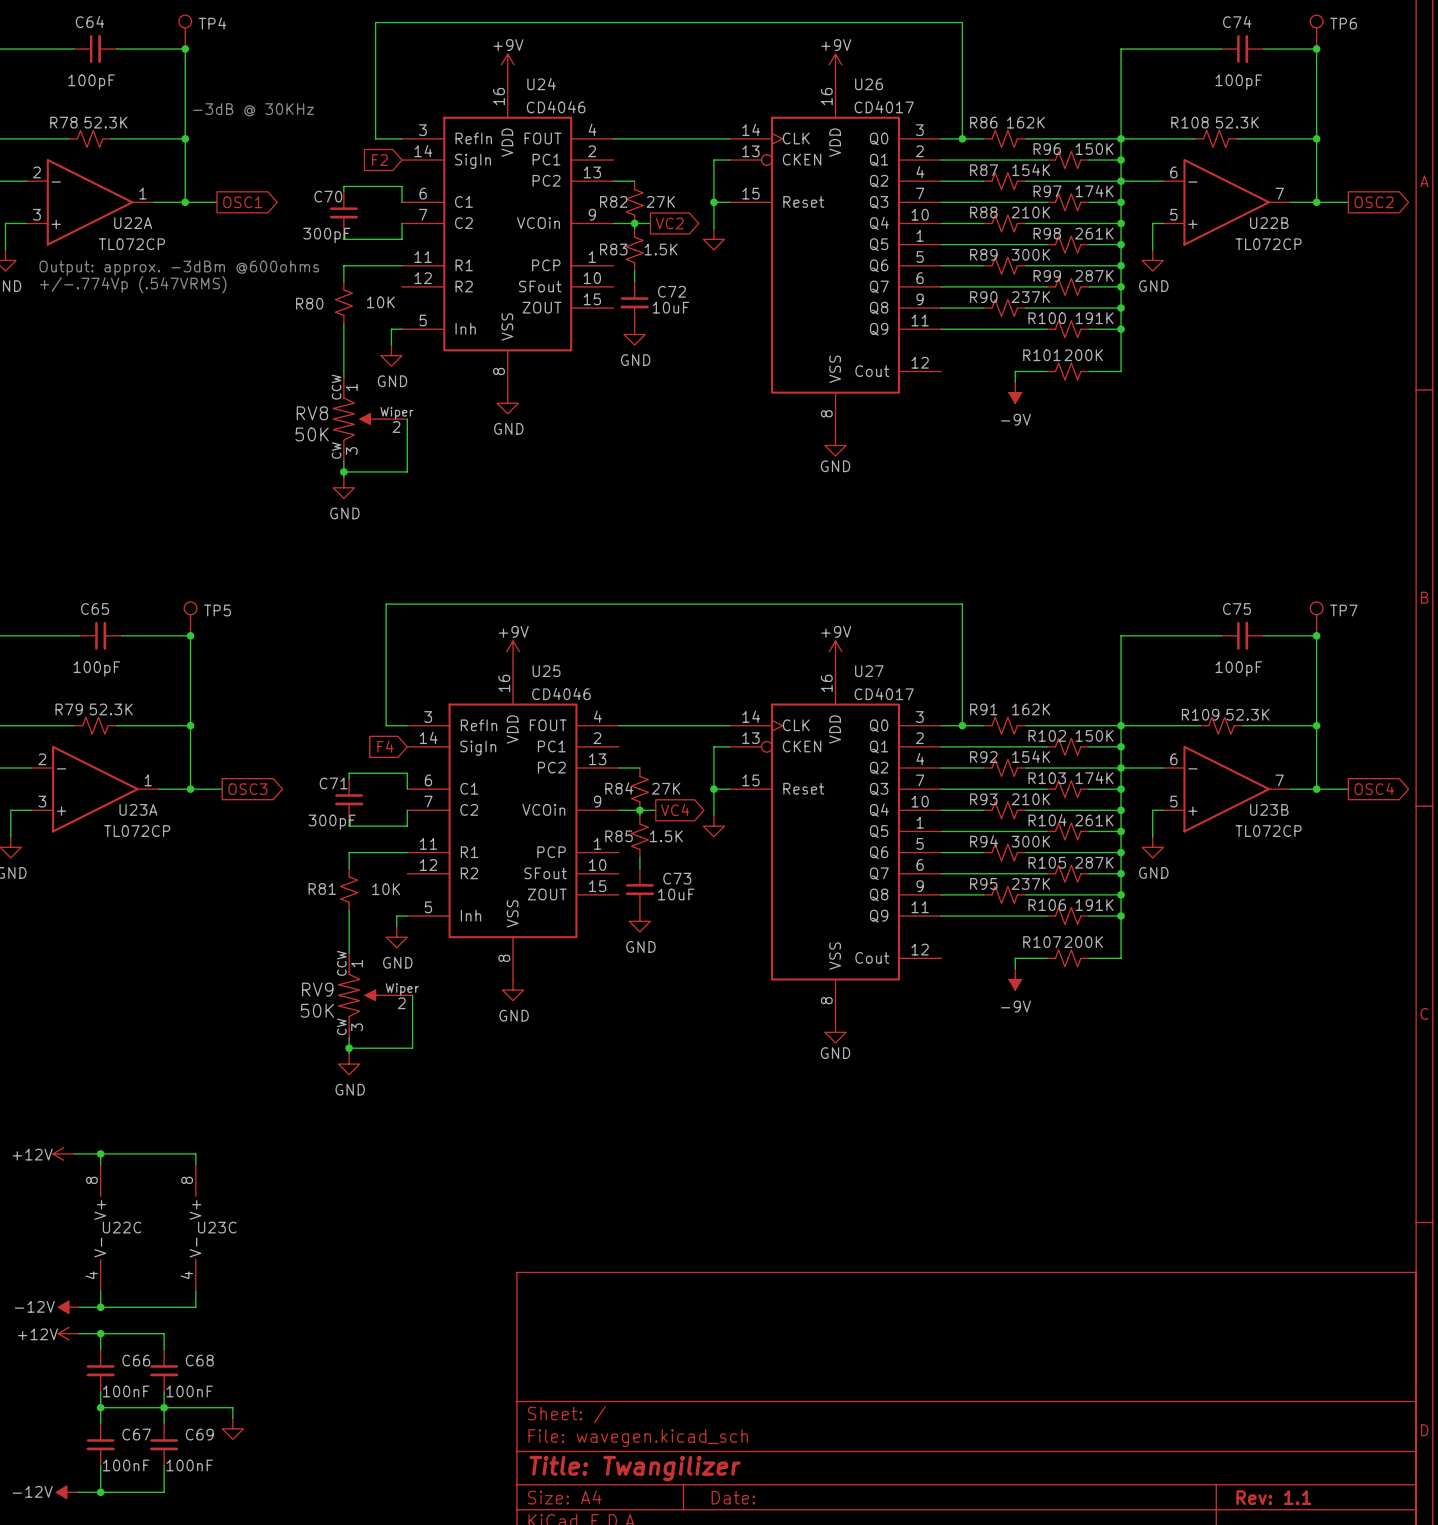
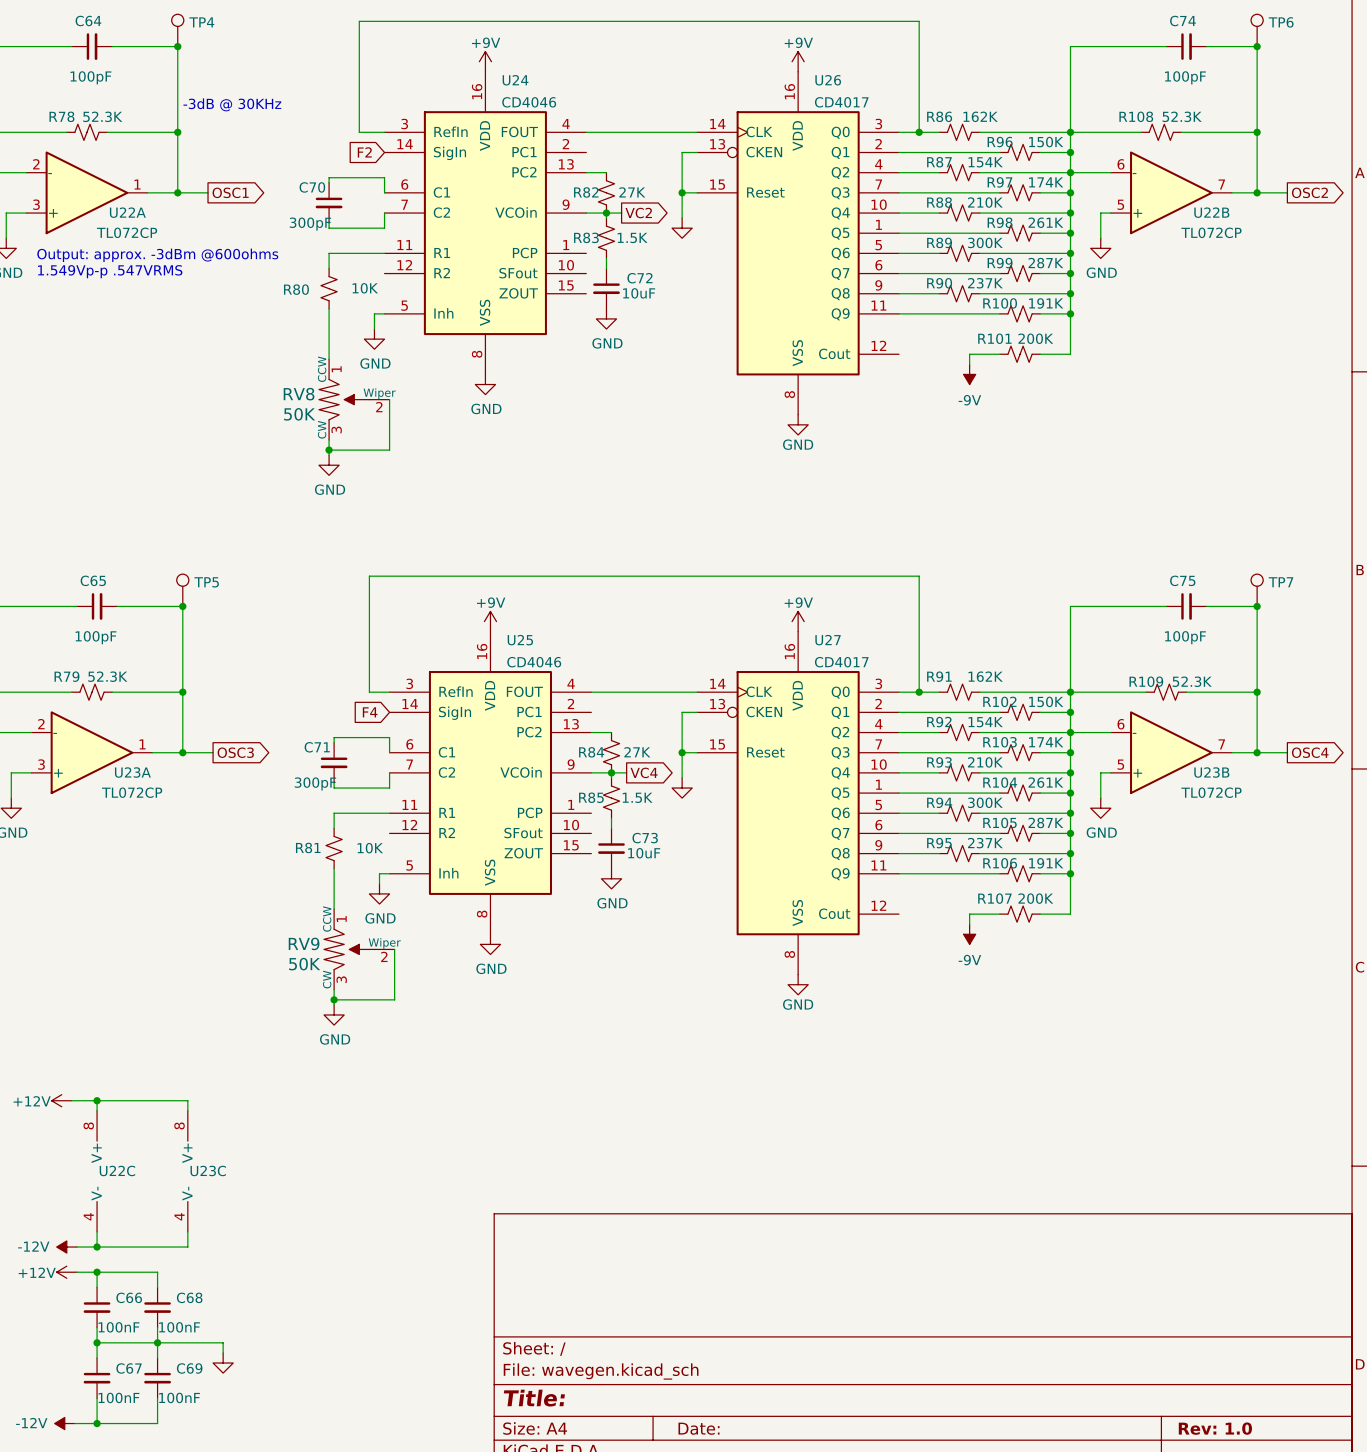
text: +/-.774Vp (.547VRMS) (133, 284) -> 1.549Vp-p .547VRMS (110, 271)
title block: Title: Twangilizer (635, 1468) -> Title: (534, 1398)
title block: Rev: 1.1 (1273, 1497) -> Rev: 1.0 (1215, 1428)

